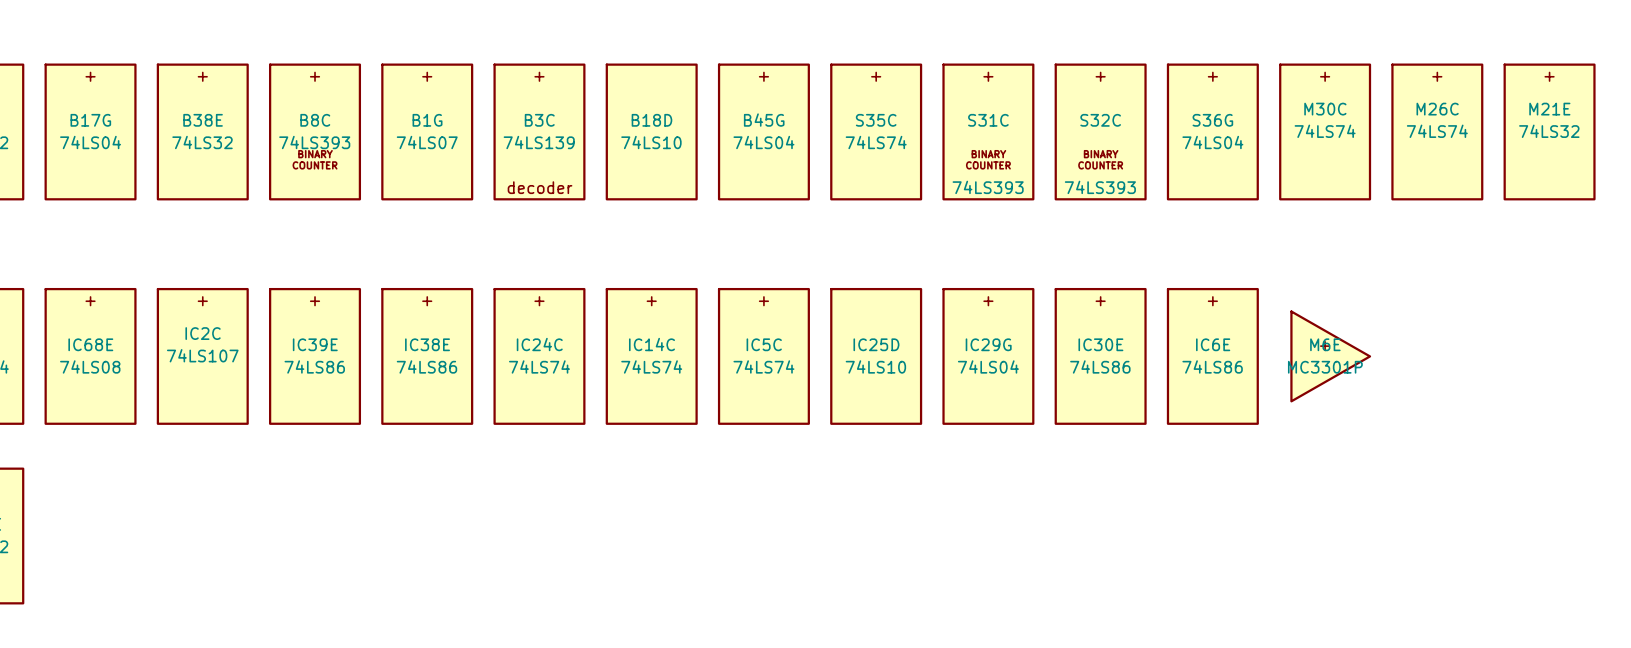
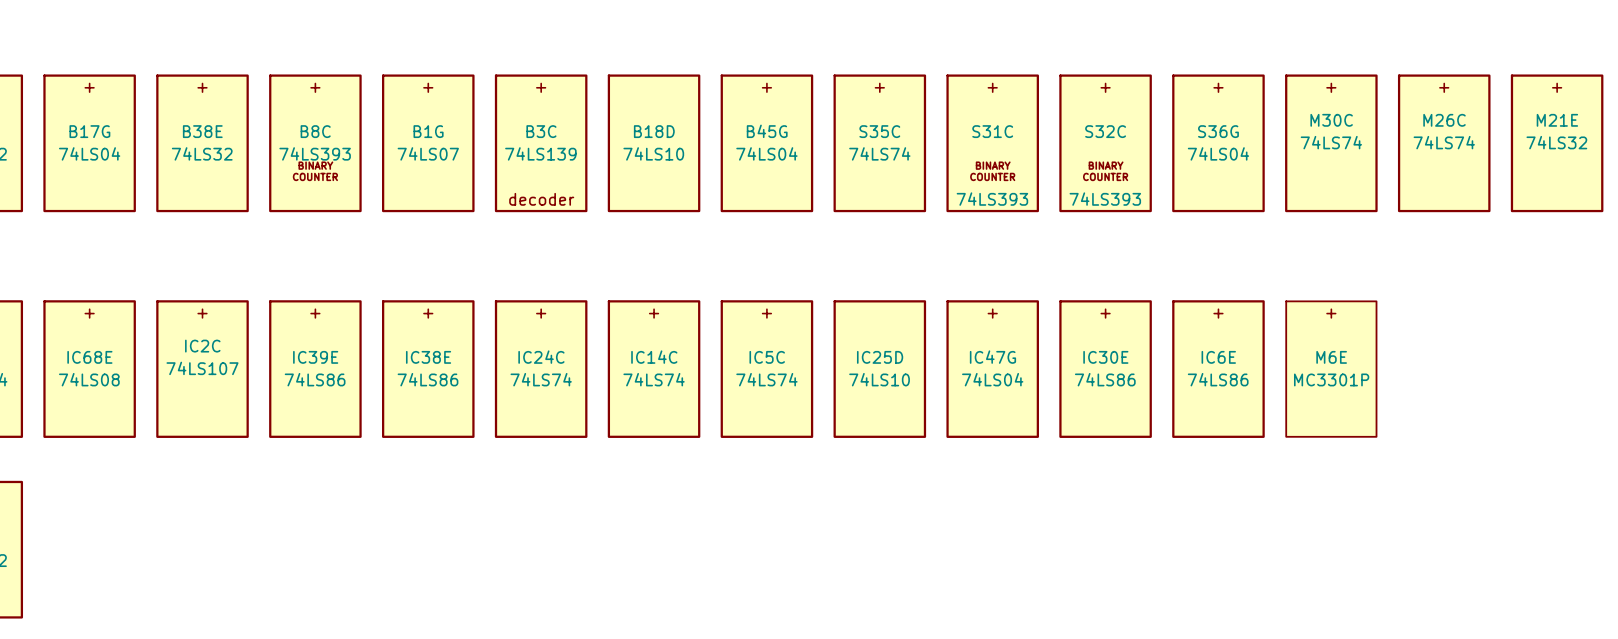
M6E symbol: [1290, 310, 1372, 403] -> [1286, 301, 1377, 437]
IC29G name: IC29G (988, 344) -> IC47G (992, 357)

